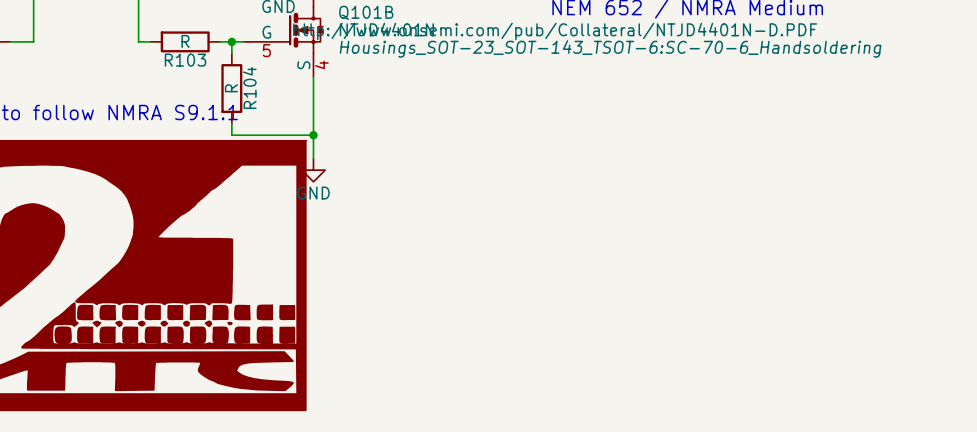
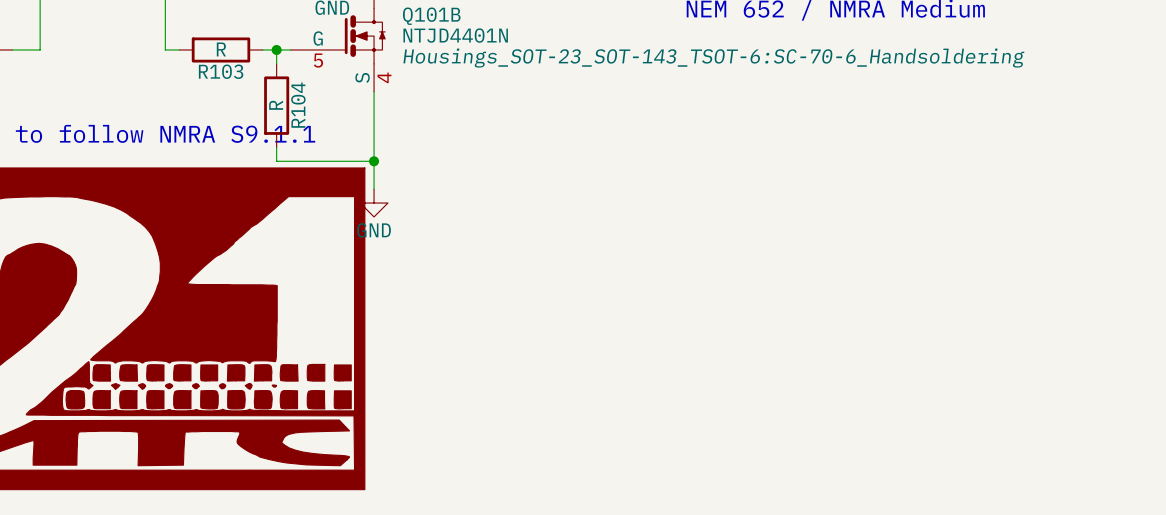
Q101B text: http://www.onsemi.com/pub/Collateral/NTJD4401N-D.PDF (555, 31) -> none

